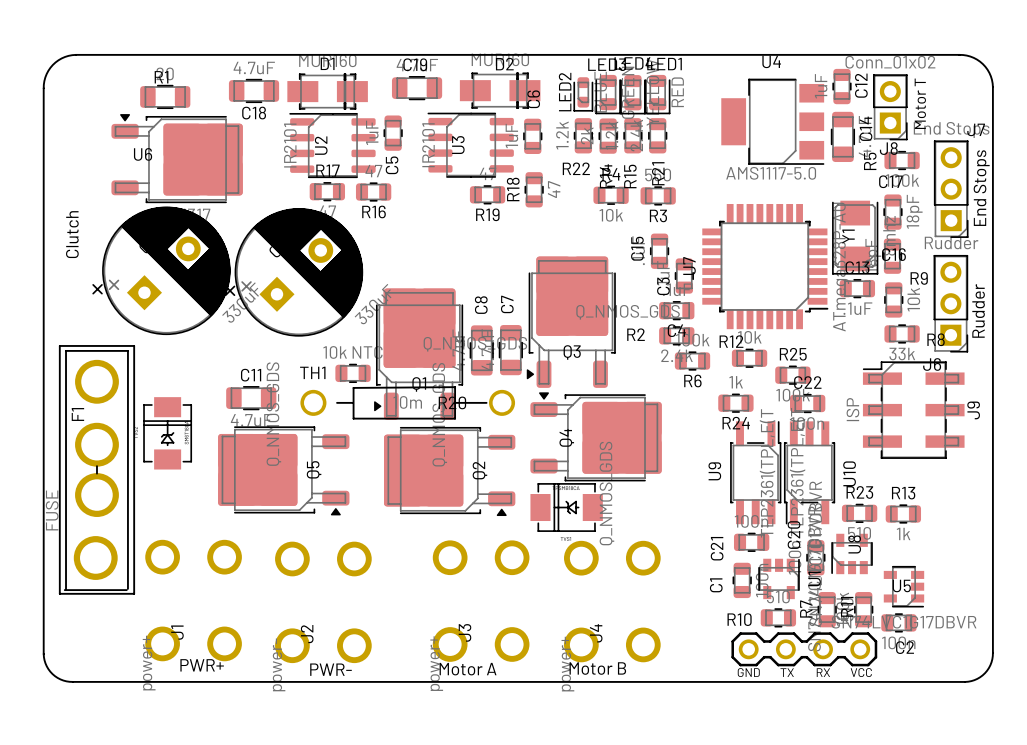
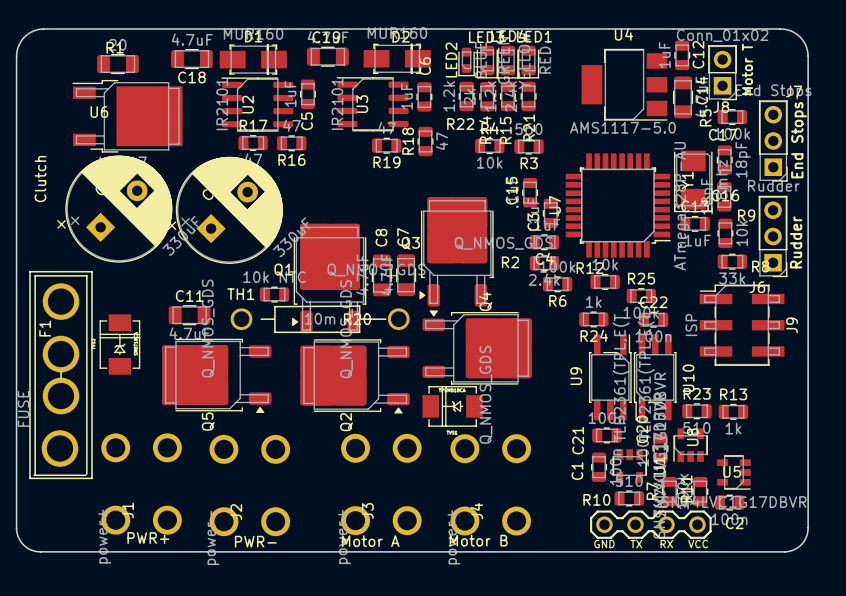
U6 footprint: [111, 114, 243, 204] -> [72, 80, 183, 153]
Q3 name position: Q3 (572, 352) -> Q3 (410, 243)
Q1 name position: Q1 (419, 384) -> Q1 (283, 270)
Q4 name position: Q4 (566, 437) -> Q4 (485, 301)
Q5 name position: Q5 (314, 469) -> Q5 (208, 421)
Q2 name position: Q2 (479, 470) -> Q2 (346, 422)

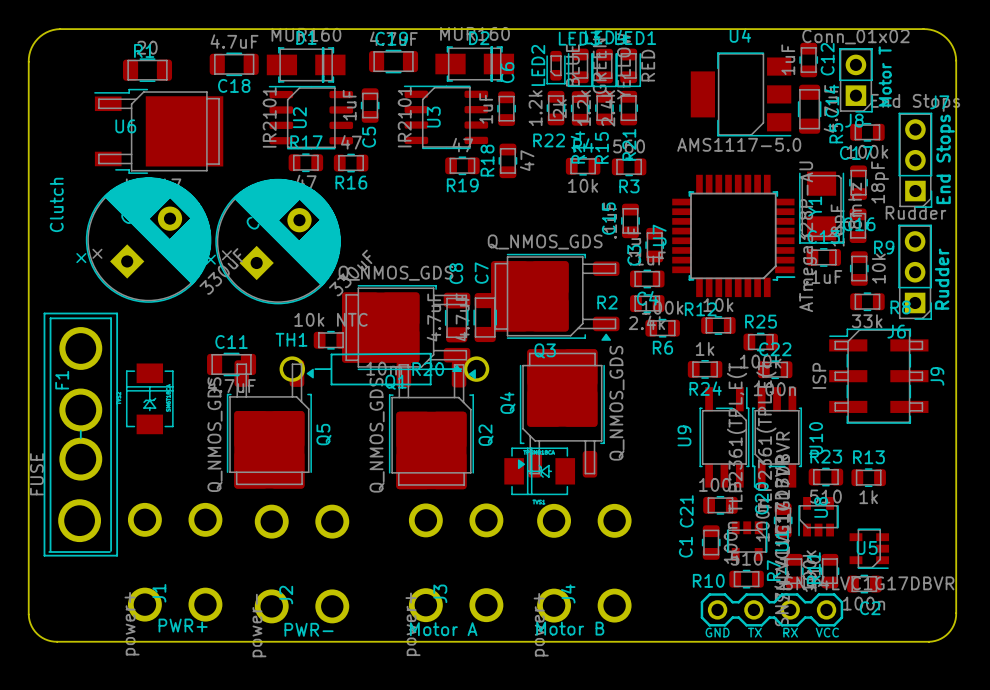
Q3 rotation: 0° (456, 251) -> 90° counterclockwise (555, 297)
Q1 rotation: 0° (329, 278) -> 90° counterclockwise (406, 328)
Q4 rotation: 0° (477, 347) -> 90° counterclockwise (561, 413)
Q5 rotation: 0° (216, 375) -> 90° counterclockwise (270, 424)
Q2 rotation: 0° (355, 376) -> 90° counterclockwise (432, 425)

